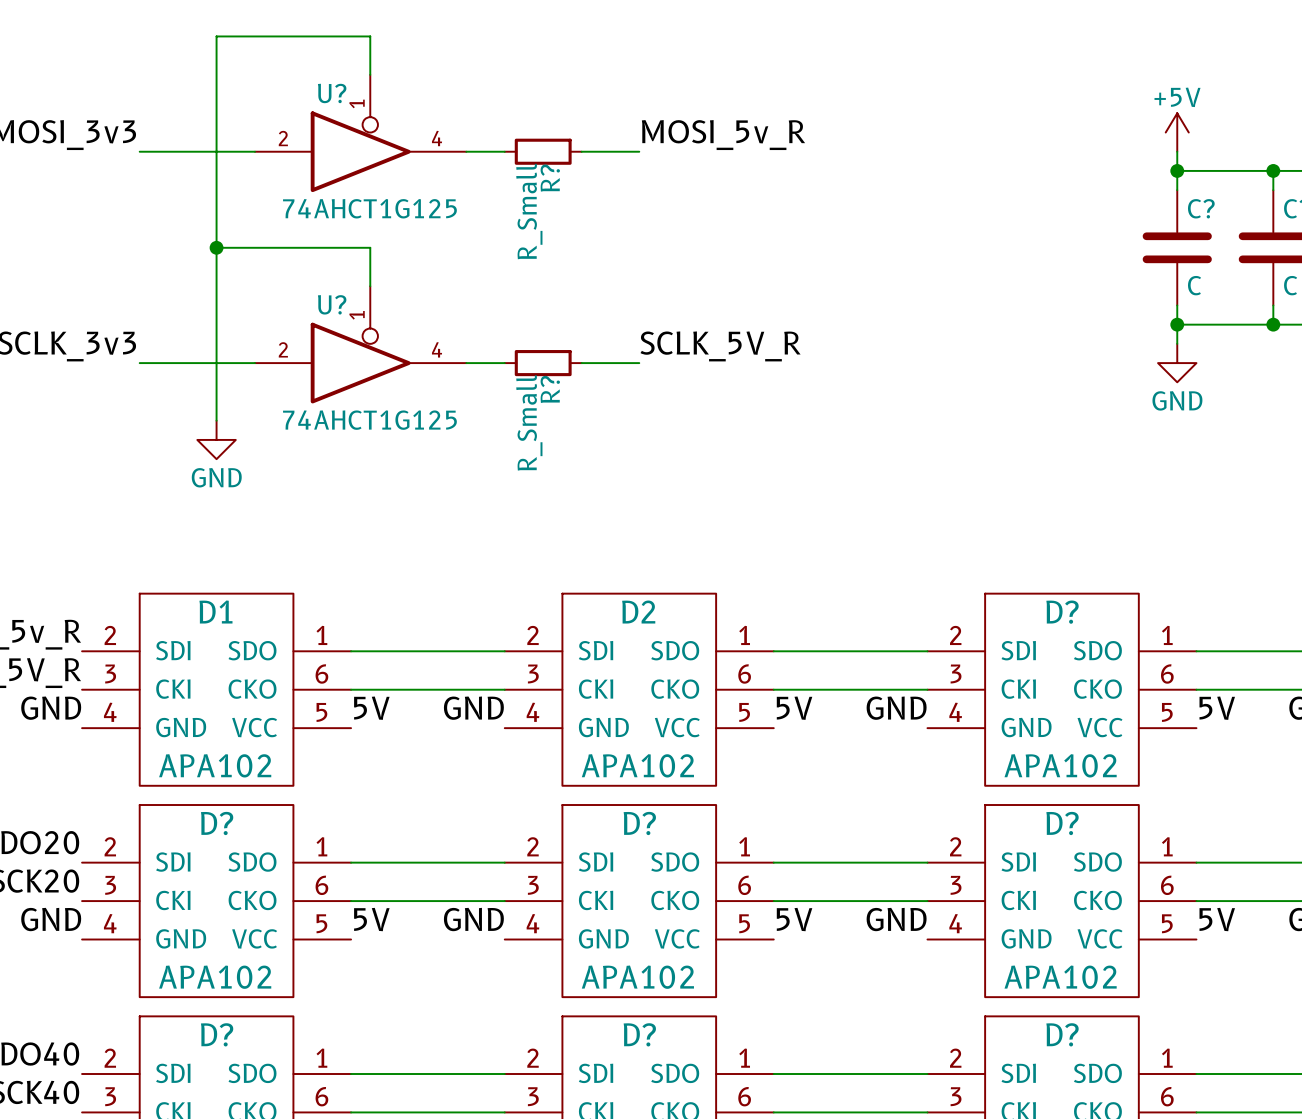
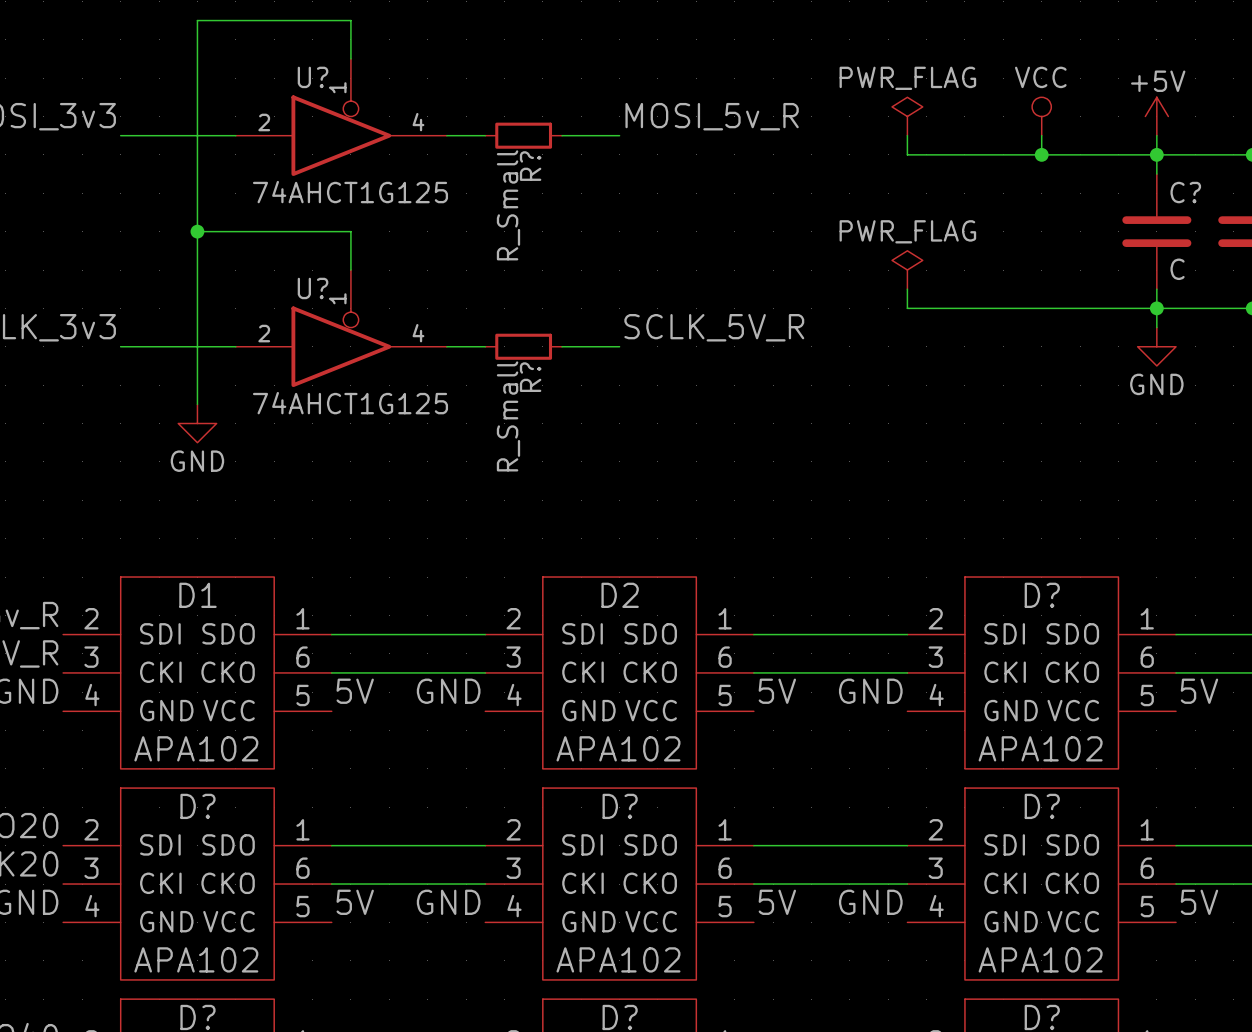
power symbol: none -> PWR_FLAG (907, 116)
power symbol: none -> VCC (1041, 116)
wire: none -> (907, 135) (907, 154) (1156, 154)
wire: none -> (1041, 135) (1041, 154)
junction: none -> (1041, 154)
power symbol: none -> PWR_FLAG (907, 270)
wire: none -> (907, 289) (907, 308) (1156, 308)

